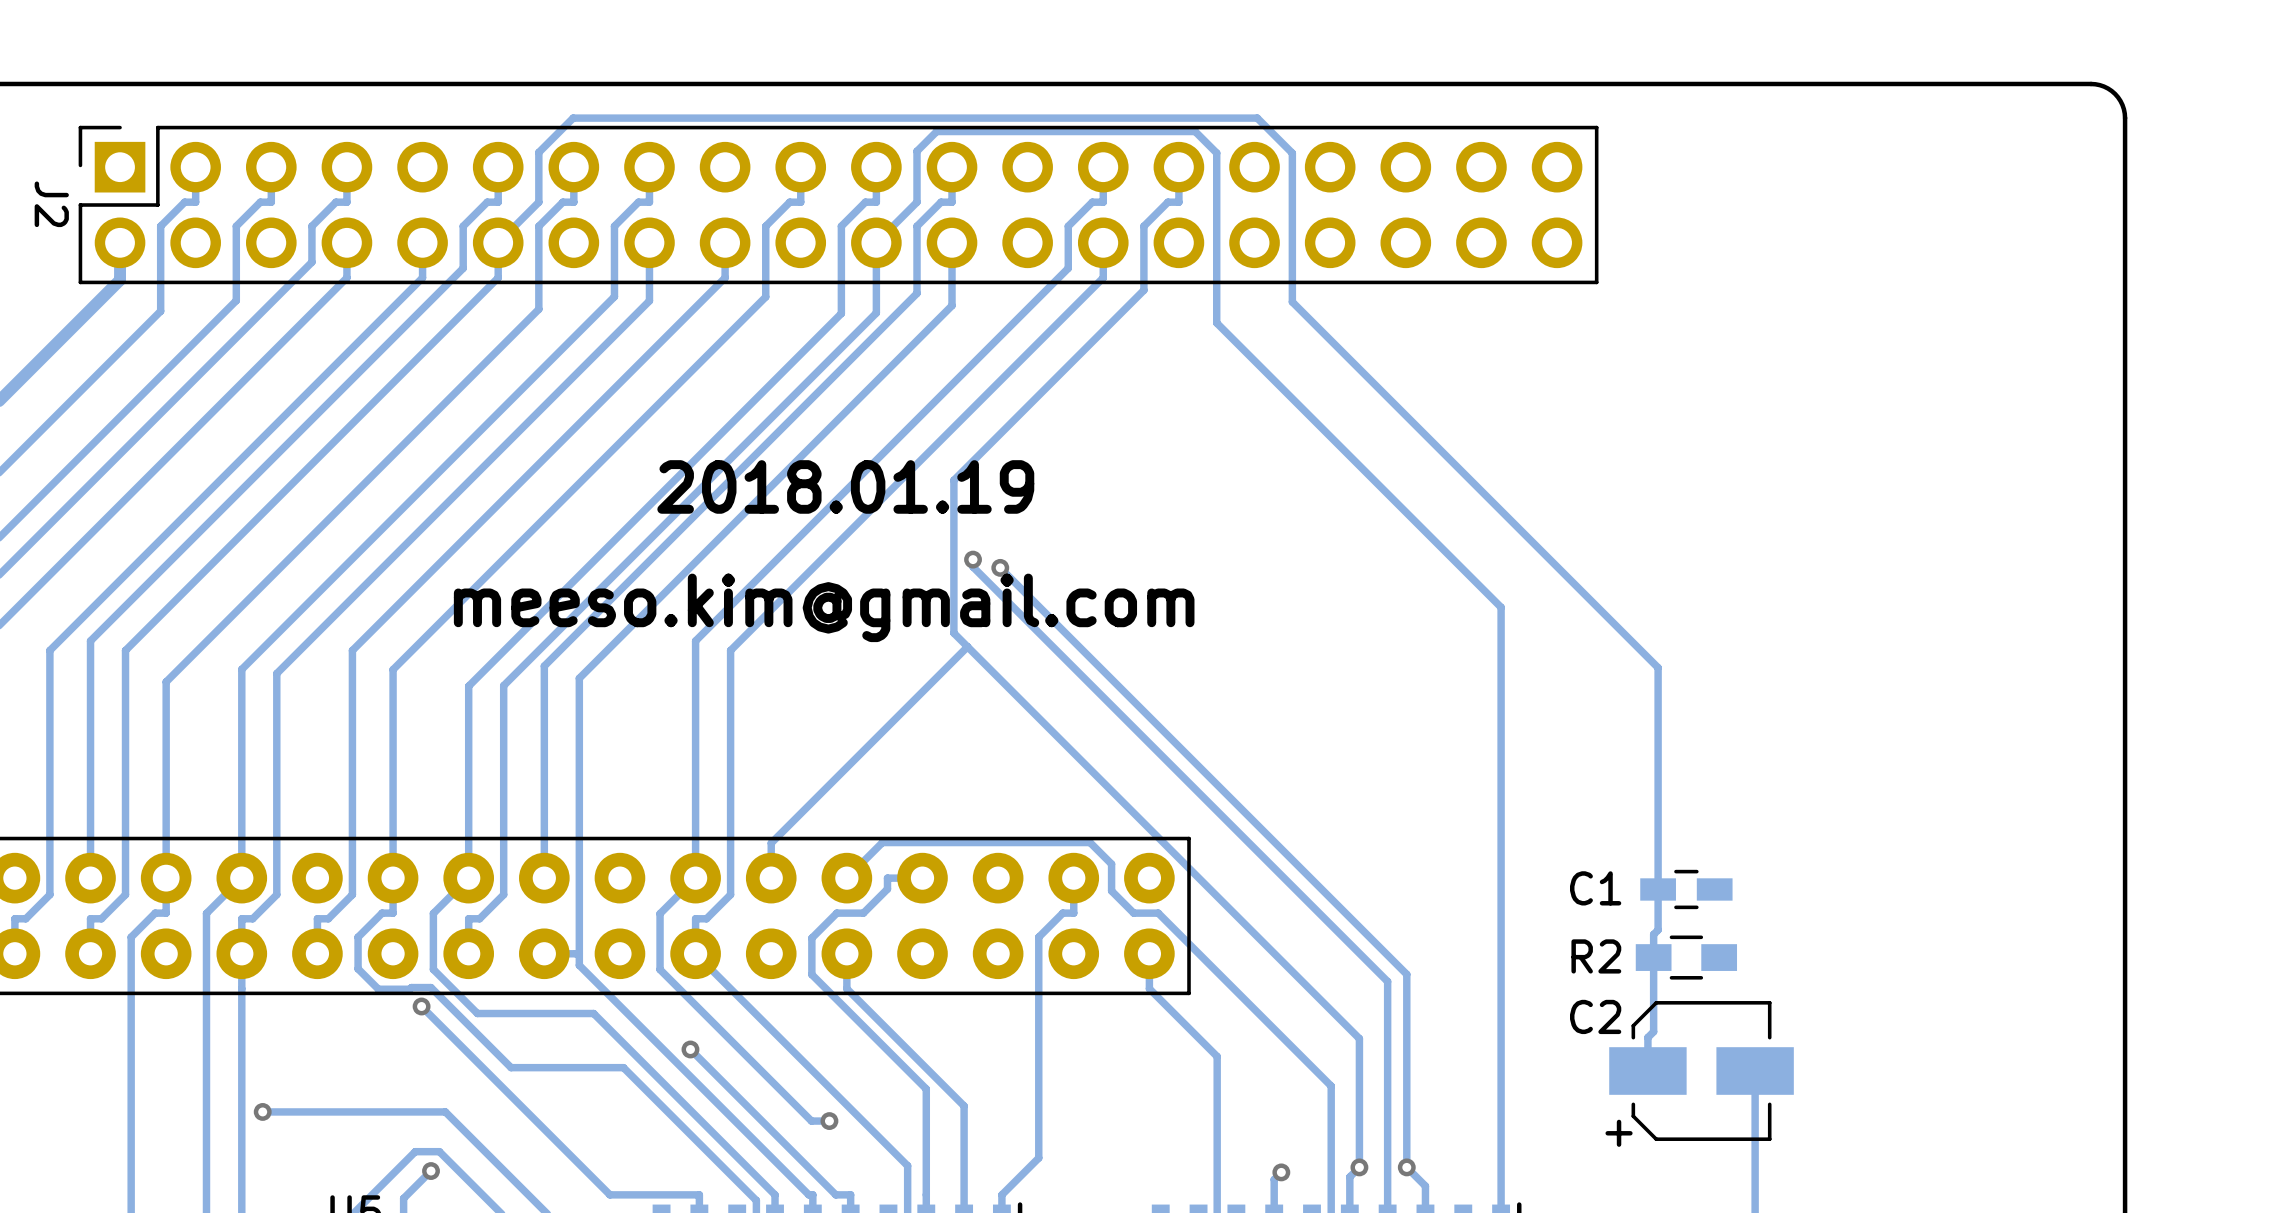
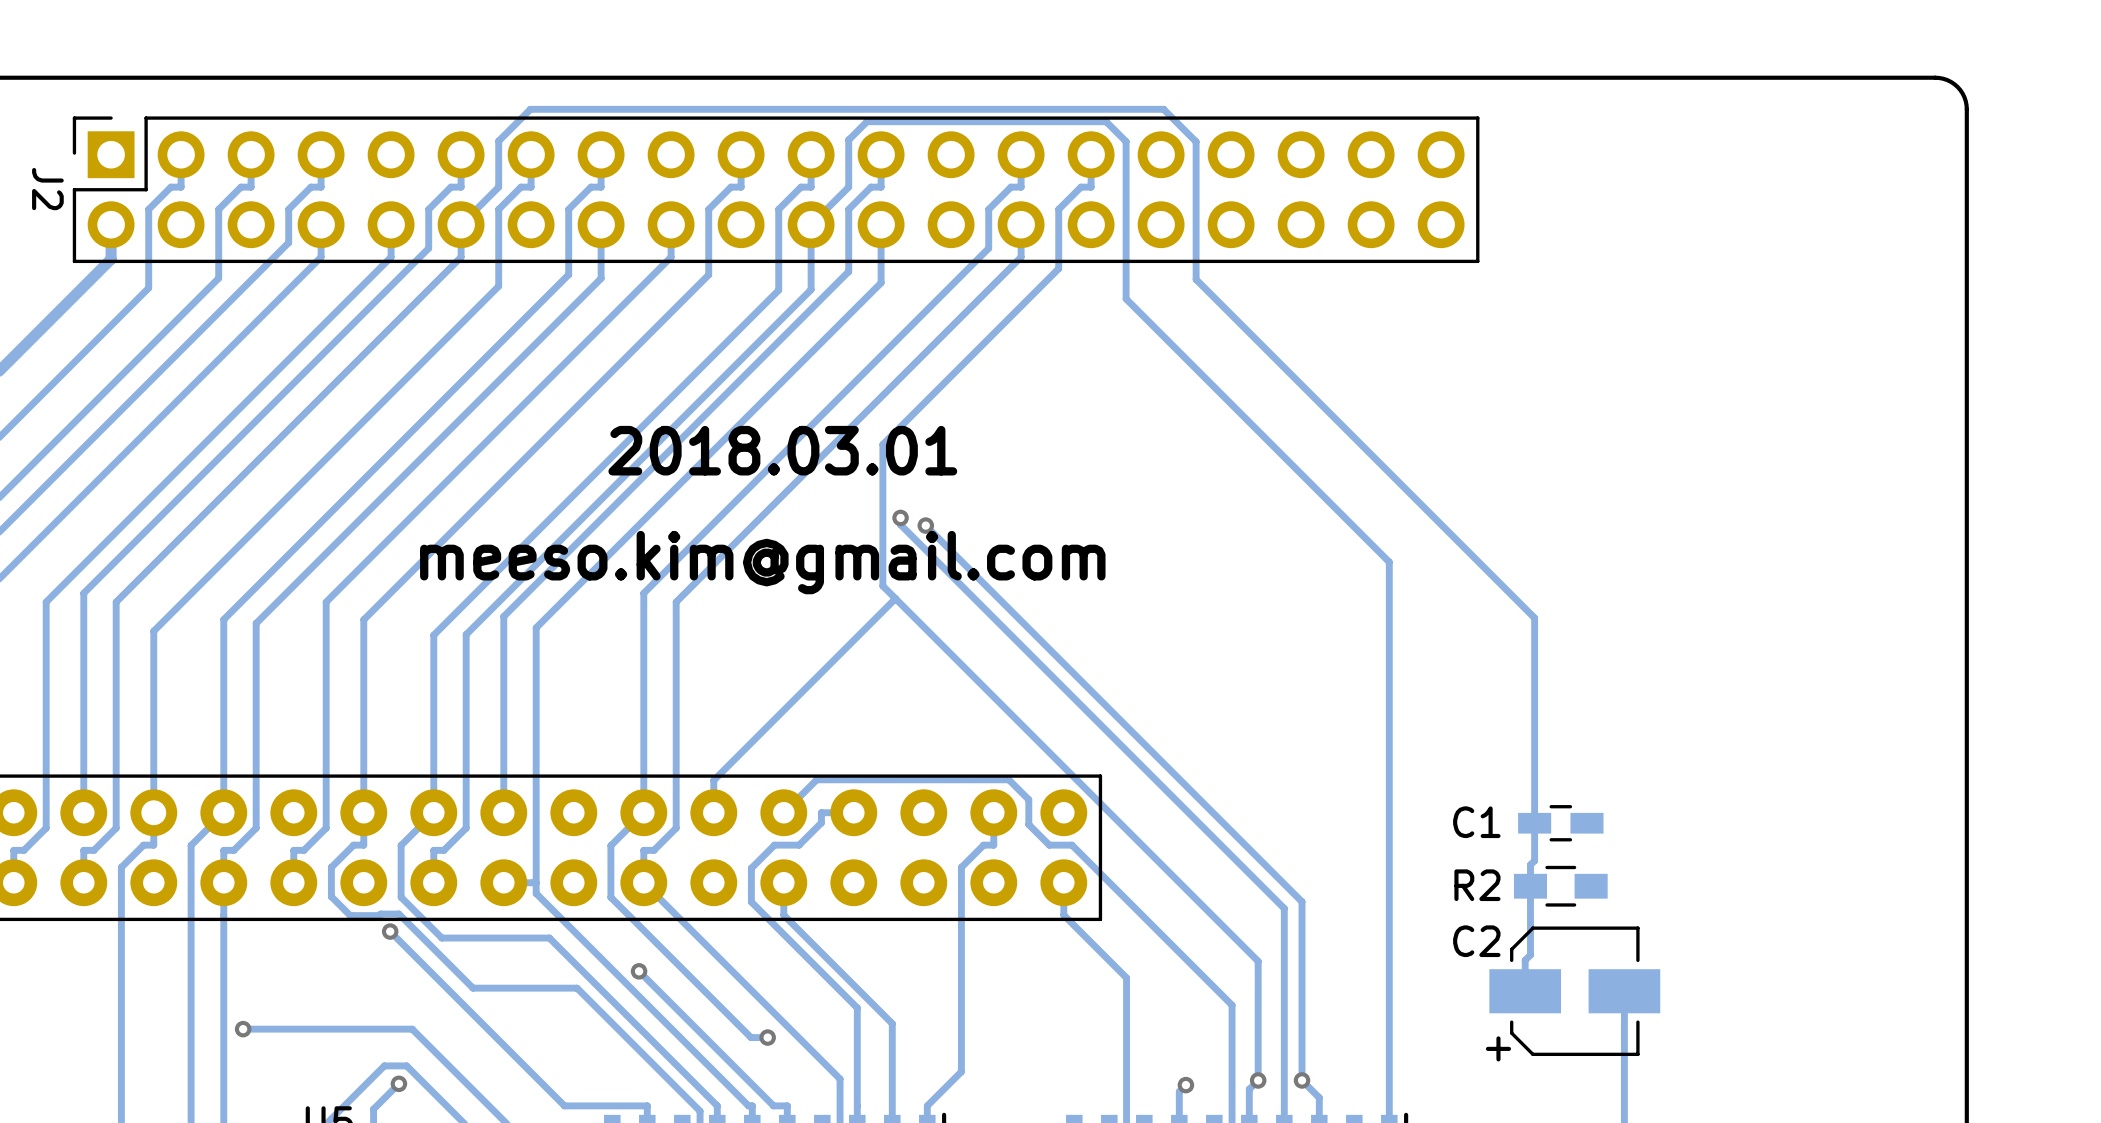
text: 2018.01.19 (845, 486) -> 2018.03.01 (782, 450)

